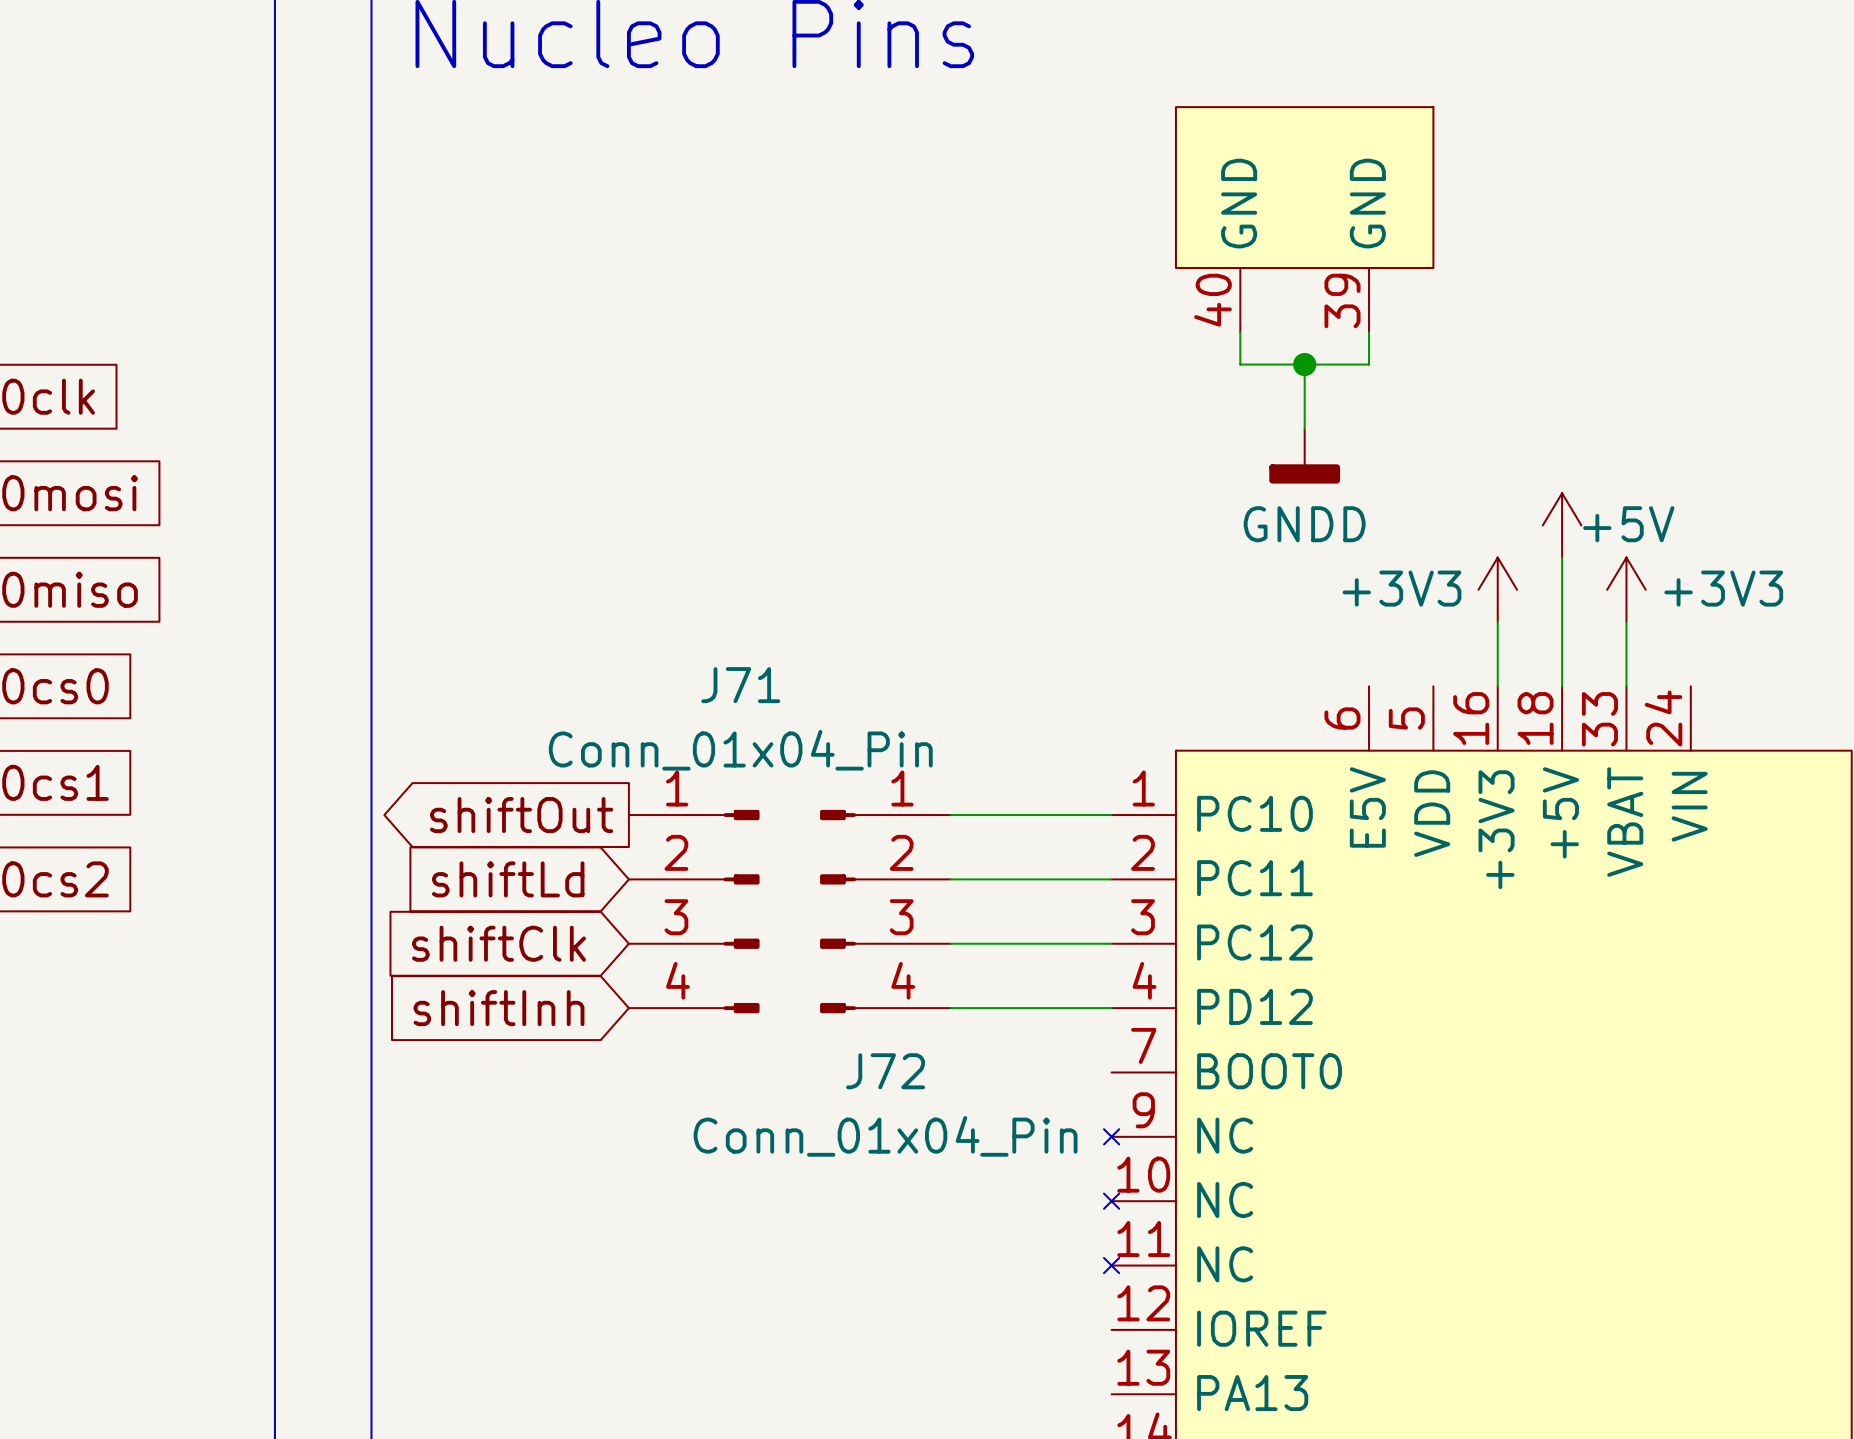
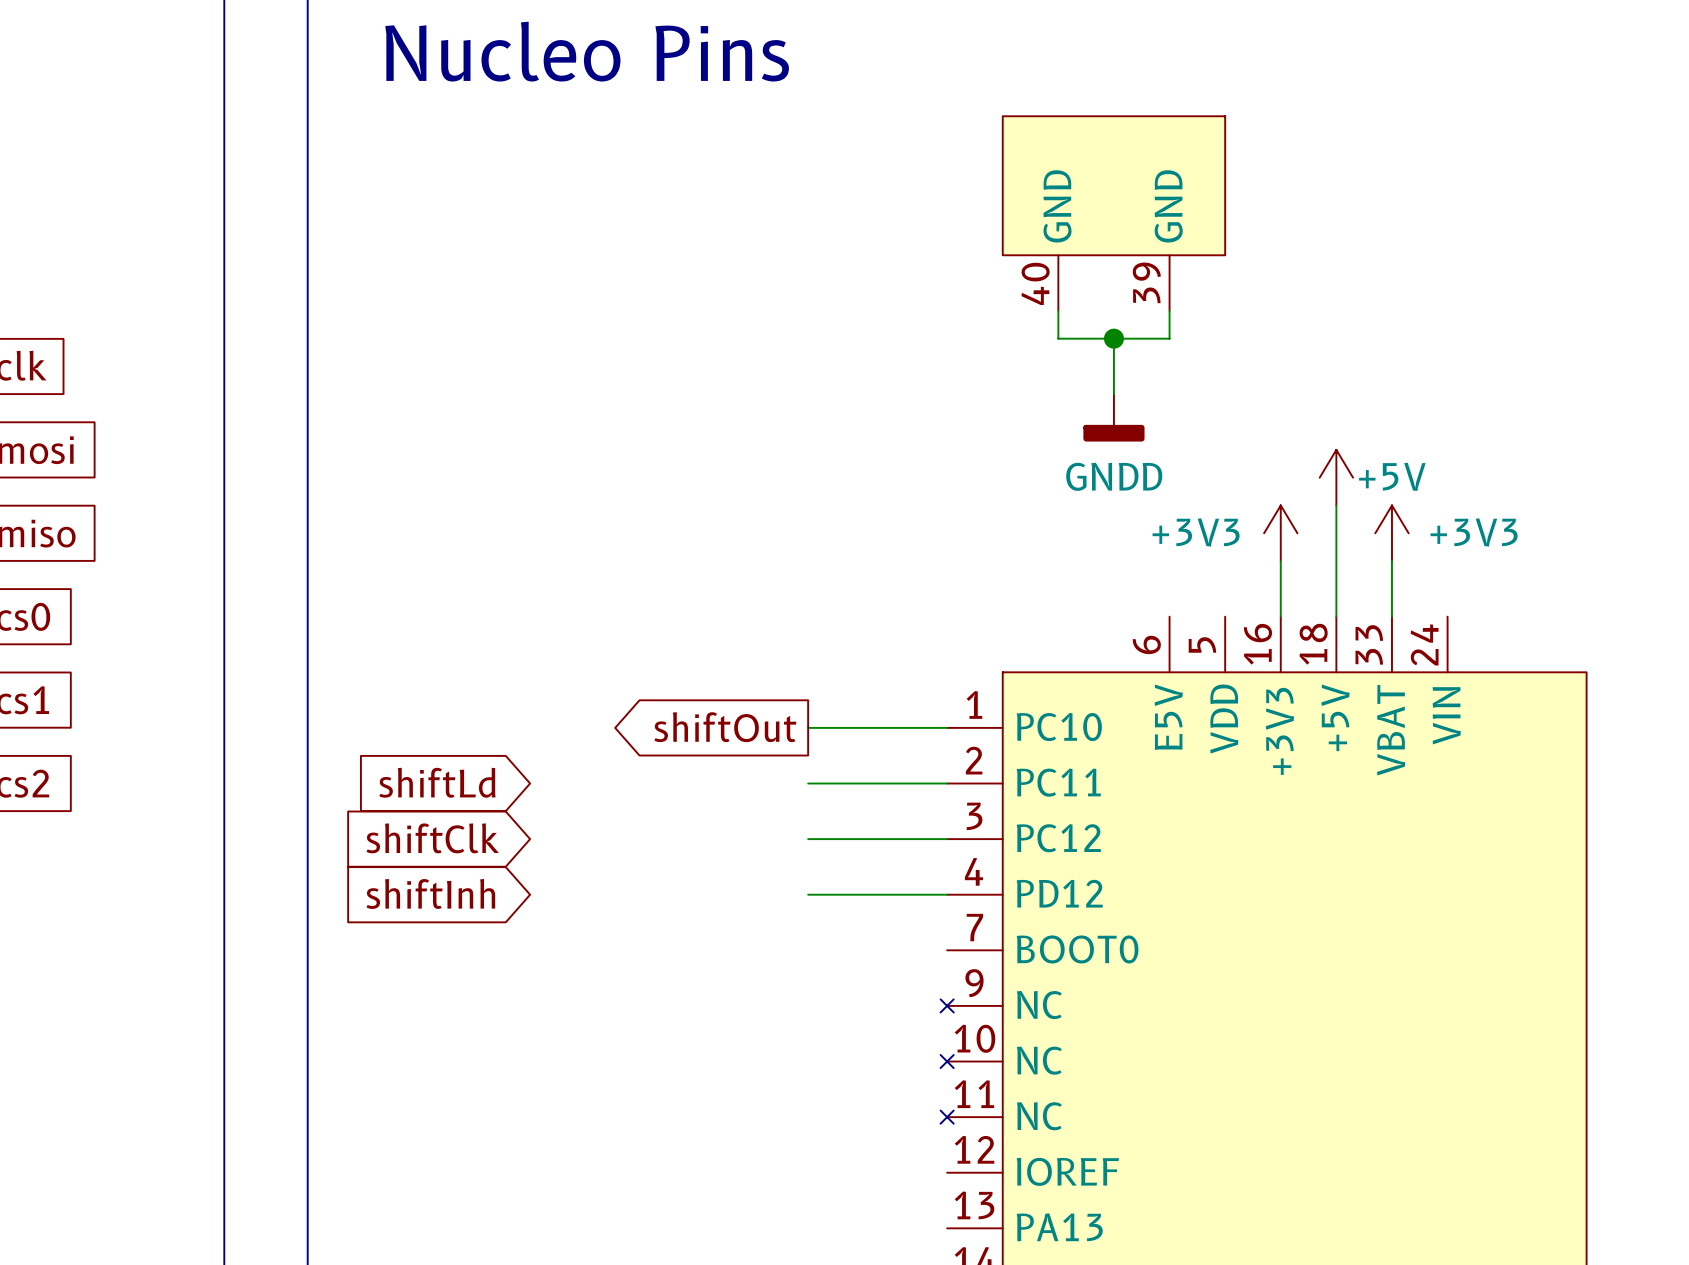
global label position: shiftOut (521, 815) -> shiftOut (725, 727)
J71: Conn_01x04_Pin (694, 911) -> none
J72: Conn_01x04_Pin (885, 911) -> none

